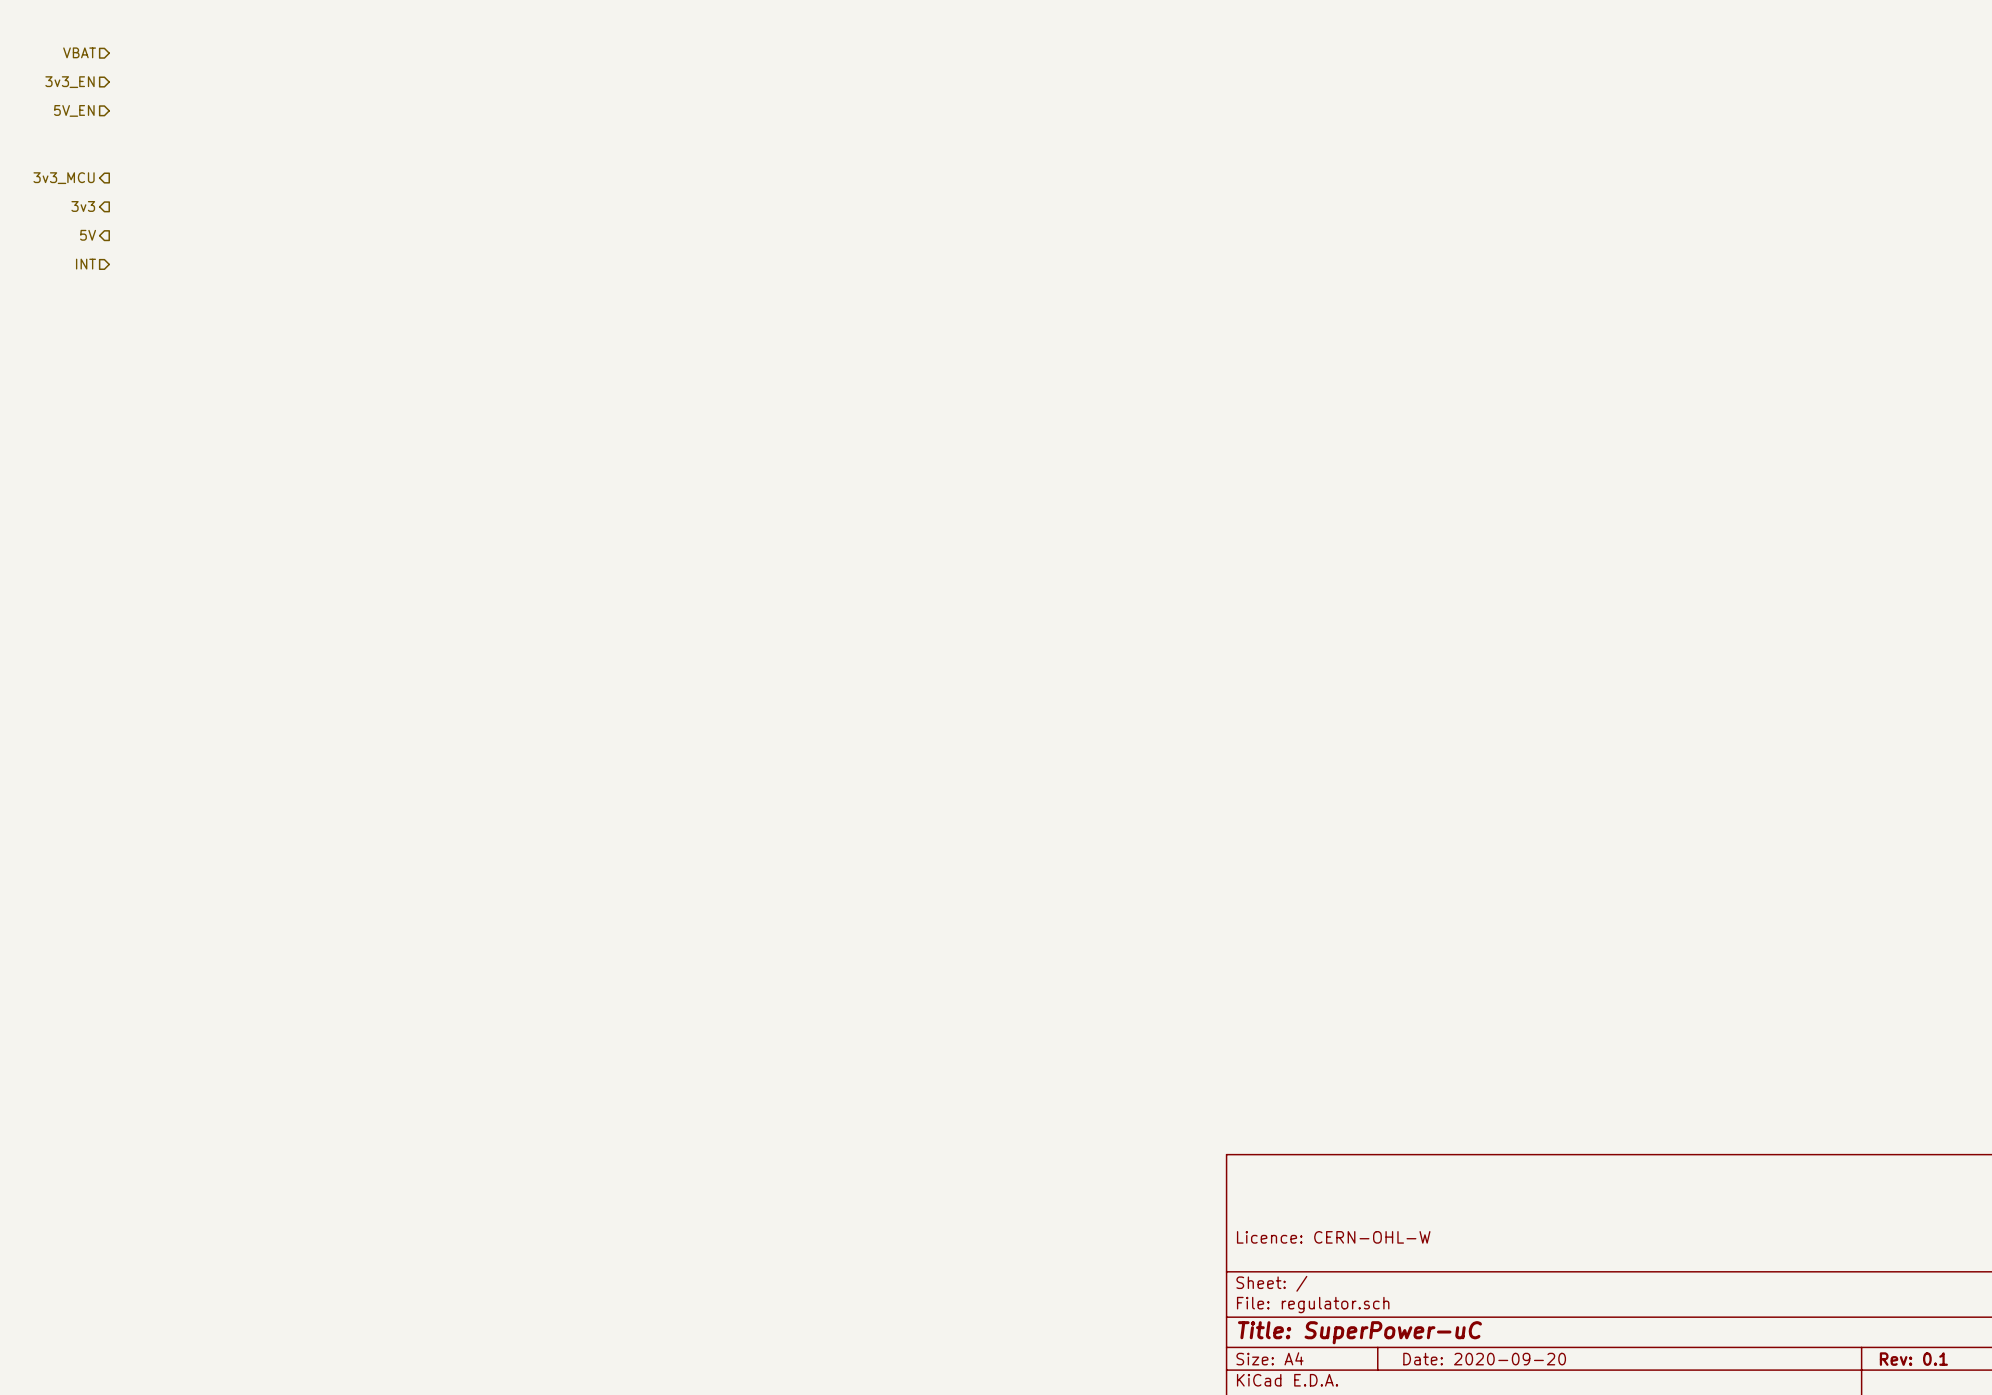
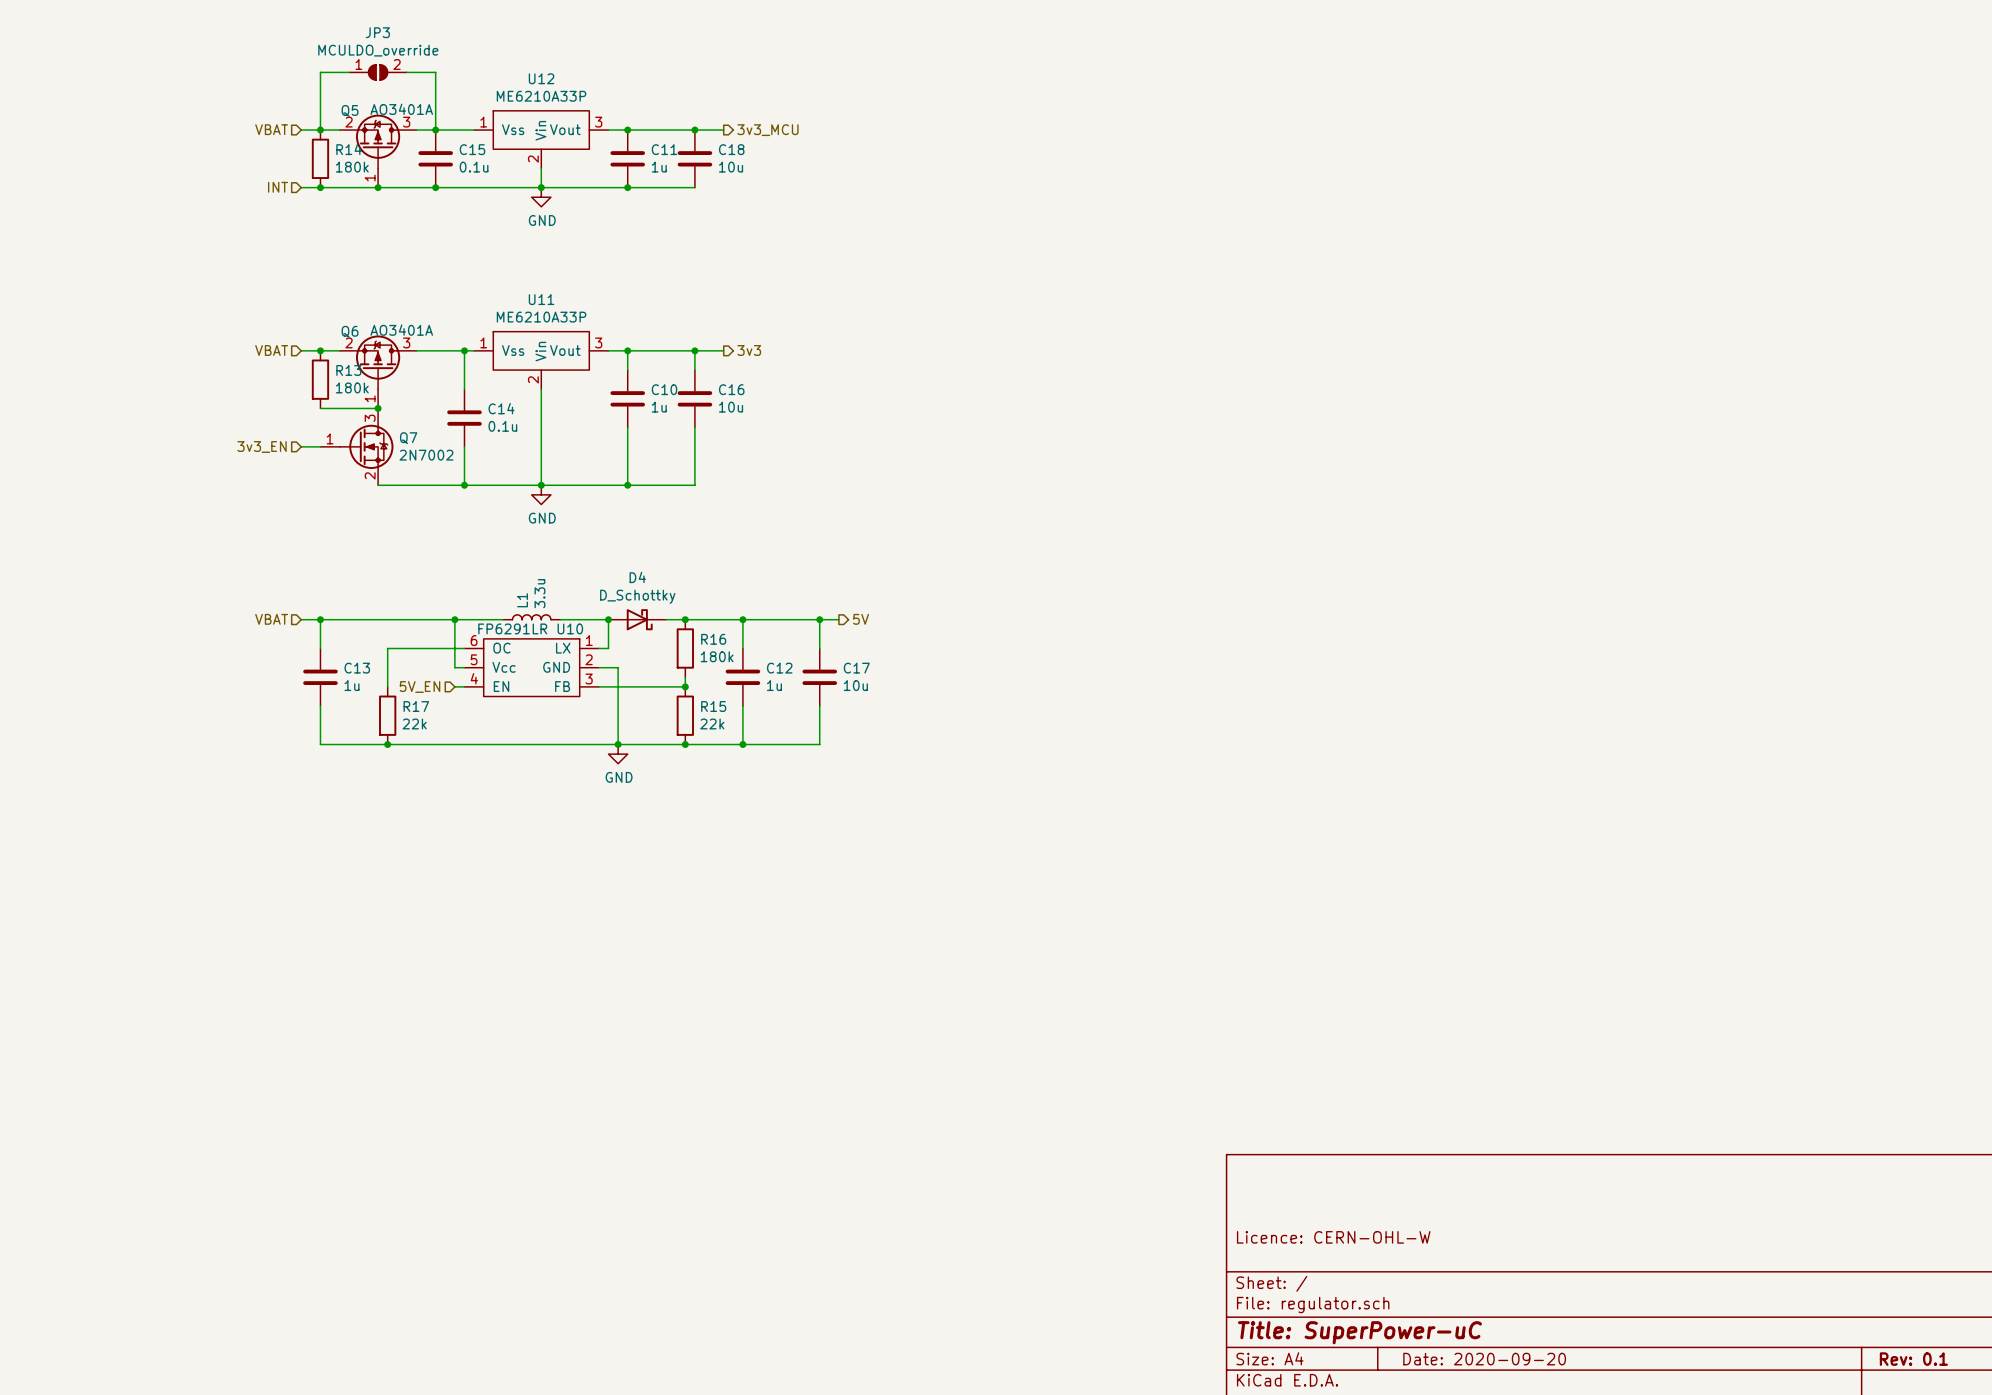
hierarchical label: VBAT (79, 52) -> none
wire: none -> (349, 72) (320, 72) (320, 130)
JP3: none -> MCULDO_override (378, 72)
wire: none -> (406, 72) (435, 72) (435, 130)
hierarchical label: 3v3_EN (70, 82) -> none
hierarchical label: 5V_EN (74, 110) -> none
hierarchical label: none -> VBAT (271, 129)
wire: none -> (301, 130) (339, 130)
junction: none -> (320, 130)
wire: none -> (416, 130) (474, 130)
junction: none -> (435, 130)
wire: none -> (608, 130) (723, 130)
junction: none -> (627, 130)
junction: none -> (694, 130)
hierarchical label: none -> 3v3_MCU (768, 130)
U12: none -> ME6210A33P (541, 139)
Q5: none -> AO3401A (378, 151)
R14: none -> 180k (320, 158)
C15: none -> 0.1u (435, 158)
C11: none -> 1u (627, 158)
C18: none -> 10u (694, 158)
wire: none -> (541, 168) (541, 187)
hierarchical label: 3v3_MCU (64, 178) -> none
hierarchical label: none -> INT (278, 187)
wire: none -> (301, 187) (694, 187)
junction: none -> (320, 187)
junction: none -> (378, 187)
junction: none -> (435, 187)
junction: none -> (541, 187)
junction: none -> (627, 187)
power symbol: none -> GND (541, 197)
hierarchical label: 3v3 (83, 206) -> none
hierarchical label: 5V (88, 235) -> none
hierarchical label: INT (86, 264) -> none
hierarchical label: none -> VBAT (271, 350)
wire: none -> (301, 350) (339, 350)
junction: none -> (320, 350)
wire: none -> (416, 350) (474, 350)
wire: none -> (464, 350) (464, 389)
junction: none -> (464, 350)
wire: none -> (608, 350) (723, 350)
wire: none -> (627, 350) (627, 370)
junction: none -> (627, 350)
wire: none -> (694, 350) (694, 370)
junction: none -> (694, 350)
hierarchical label: none -> 3v3 (749, 350)
U11: none -> ME6210A33P (541, 360)
Q6: none -> AO3401A (378, 371)
R13: none -> 180k (320, 379)
wire: none -> (541, 389) (541, 485)
C10: none -> 1u (627, 398)
C16: none -> 10u (694, 398)
wire: none -> (320, 408) (378, 408)
junction: none -> (378, 408)
C14: none -> 0.1u (464, 418)
wire: none -> (627, 427) (627, 485)
wire: none -> (694, 427) (694, 485) (378, 485)
hierarchical label: none -> 3v3_EN (262, 446)
wire: none -> (301, 446) (320, 446)
Q7: none -> 2N7002 (356, 446)
wire: none -> (464, 446) (464, 485)
junction: none -> (464, 485)
junction: none -> (541, 485)
junction: none -> (627, 485)
power symbol: none -> GND (541, 494)
L1: none -> 3.3u (531, 617)
hierarchical label: none -> VBAT (271, 619)
wire: none -> (301, 619) (502, 619)
wire: none -> (320, 619) (320, 648)
junction: none -> (320, 619)
wire: none -> (454, 619) (454, 667) (464, 667)
junction: none -> (454, 619)
wire: none -> (560, 619) (608, 619) (608, 648) (598, 648)
junction: none -> (608, 619)
D4: none -> D_Schottky (637, 619)
wire: none -> (666, 619) (838, 619)
junction: none -> (685, 619)
wire: none -> (742, 619) (742, 648)
junction: none -> (742, 619)
wire: none -> (819, 619) (819, 648)
junction: none -> (819, 619)
hierarchical label: none -> 5V (861, 619)
wire: none -> (464, 648) (387, 648) (387, 686)
R16: none -> 180k (685, 648)
U10: none -> FP6291LR (531, 667)
wire: none -> (598, 667) (618, 667) (618, 744)
C13: none -> 1u (320, 677)
wire: none -> (685, 677) (685, 686) (598, 686)
C12: none -> 1u (742, 677)
C17: none -> 10u (819, 677)
wire: none -> (454, 686) (464, 686)
junction: none -> (685, 686)
hierarchical label: none -> 5V_EN (419, 687)
wire: none -> (320, 706) (320, 744) (819, 744) (819, 706)
wire: none -> (742, 706) (742, 744)
R17: none -> 22k (387, 715)
R15: none -> 22k (685, 715)
junction: none -> (387, 744)
junction: none -> (618, 744)
junction: none -> (685, 744)
junction: none -> (742, 744)
power symbol: none -> GND (618, 754)

